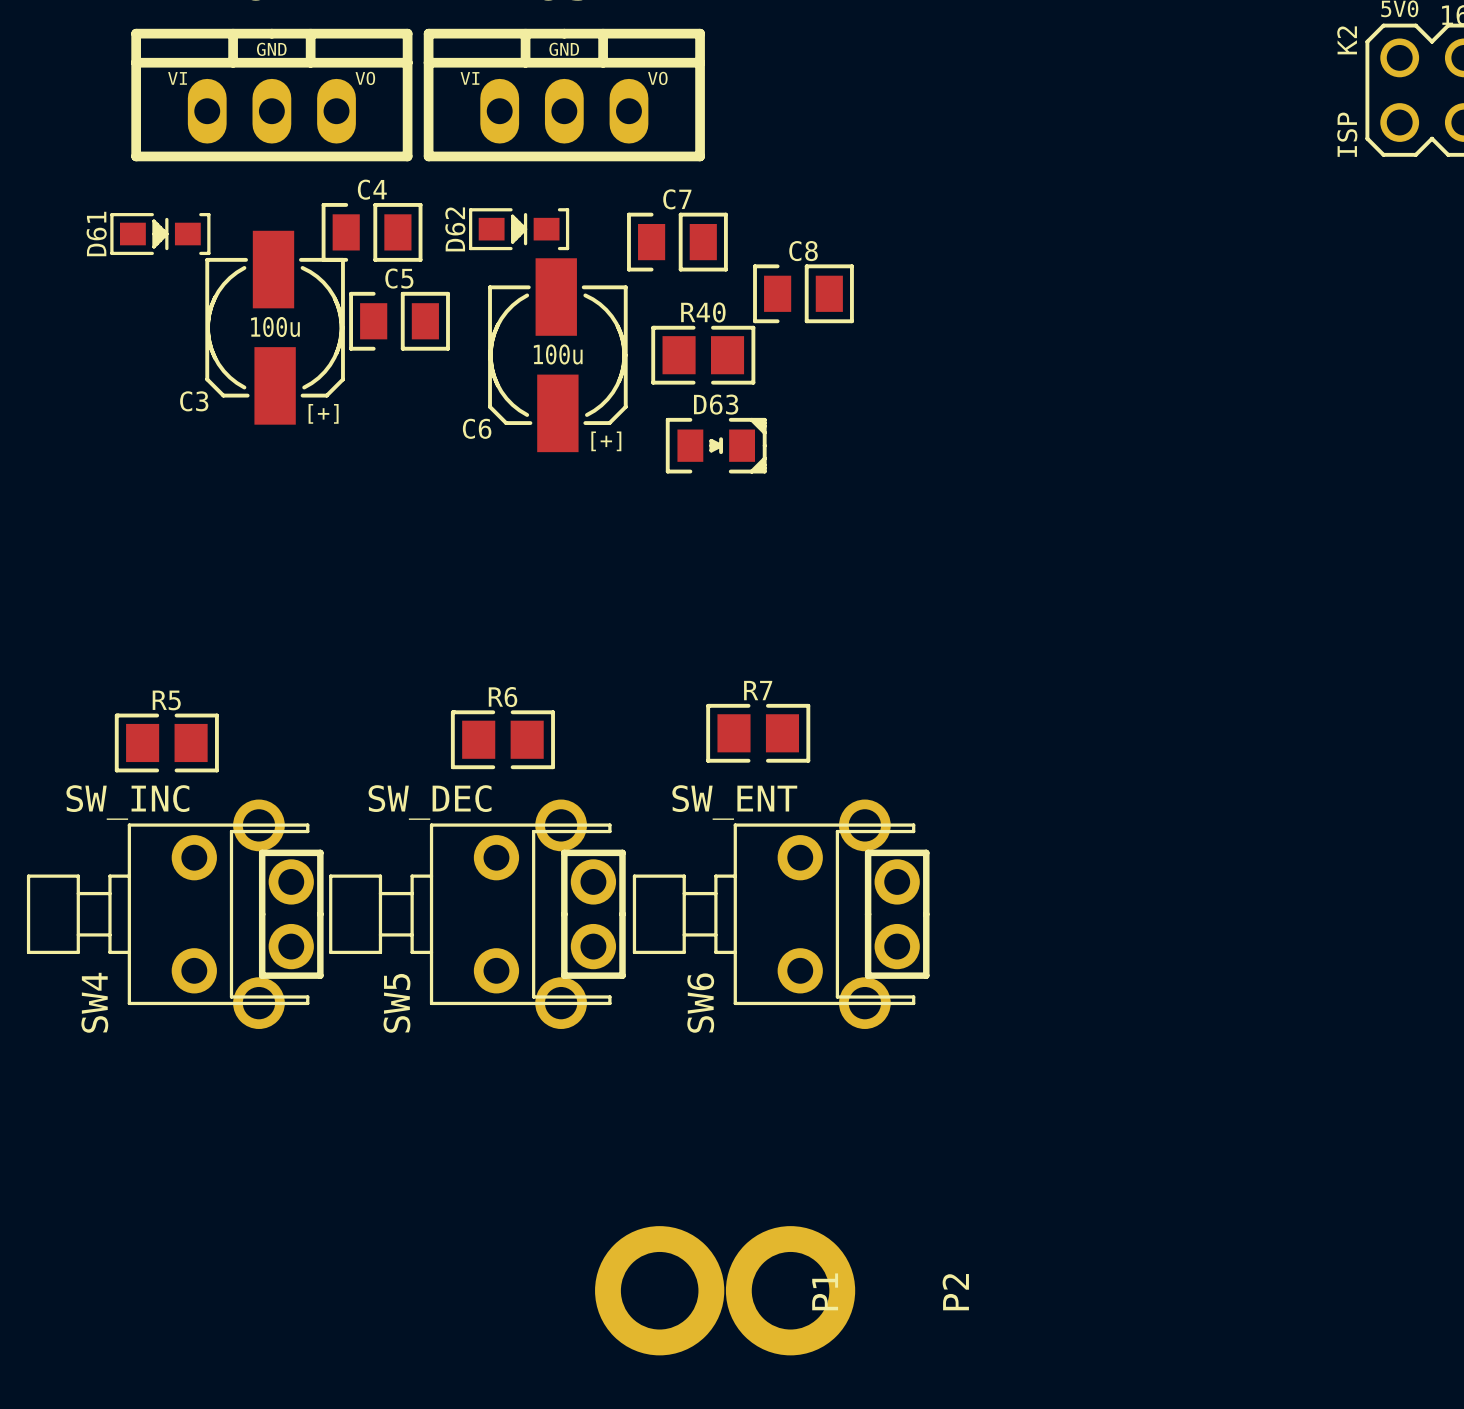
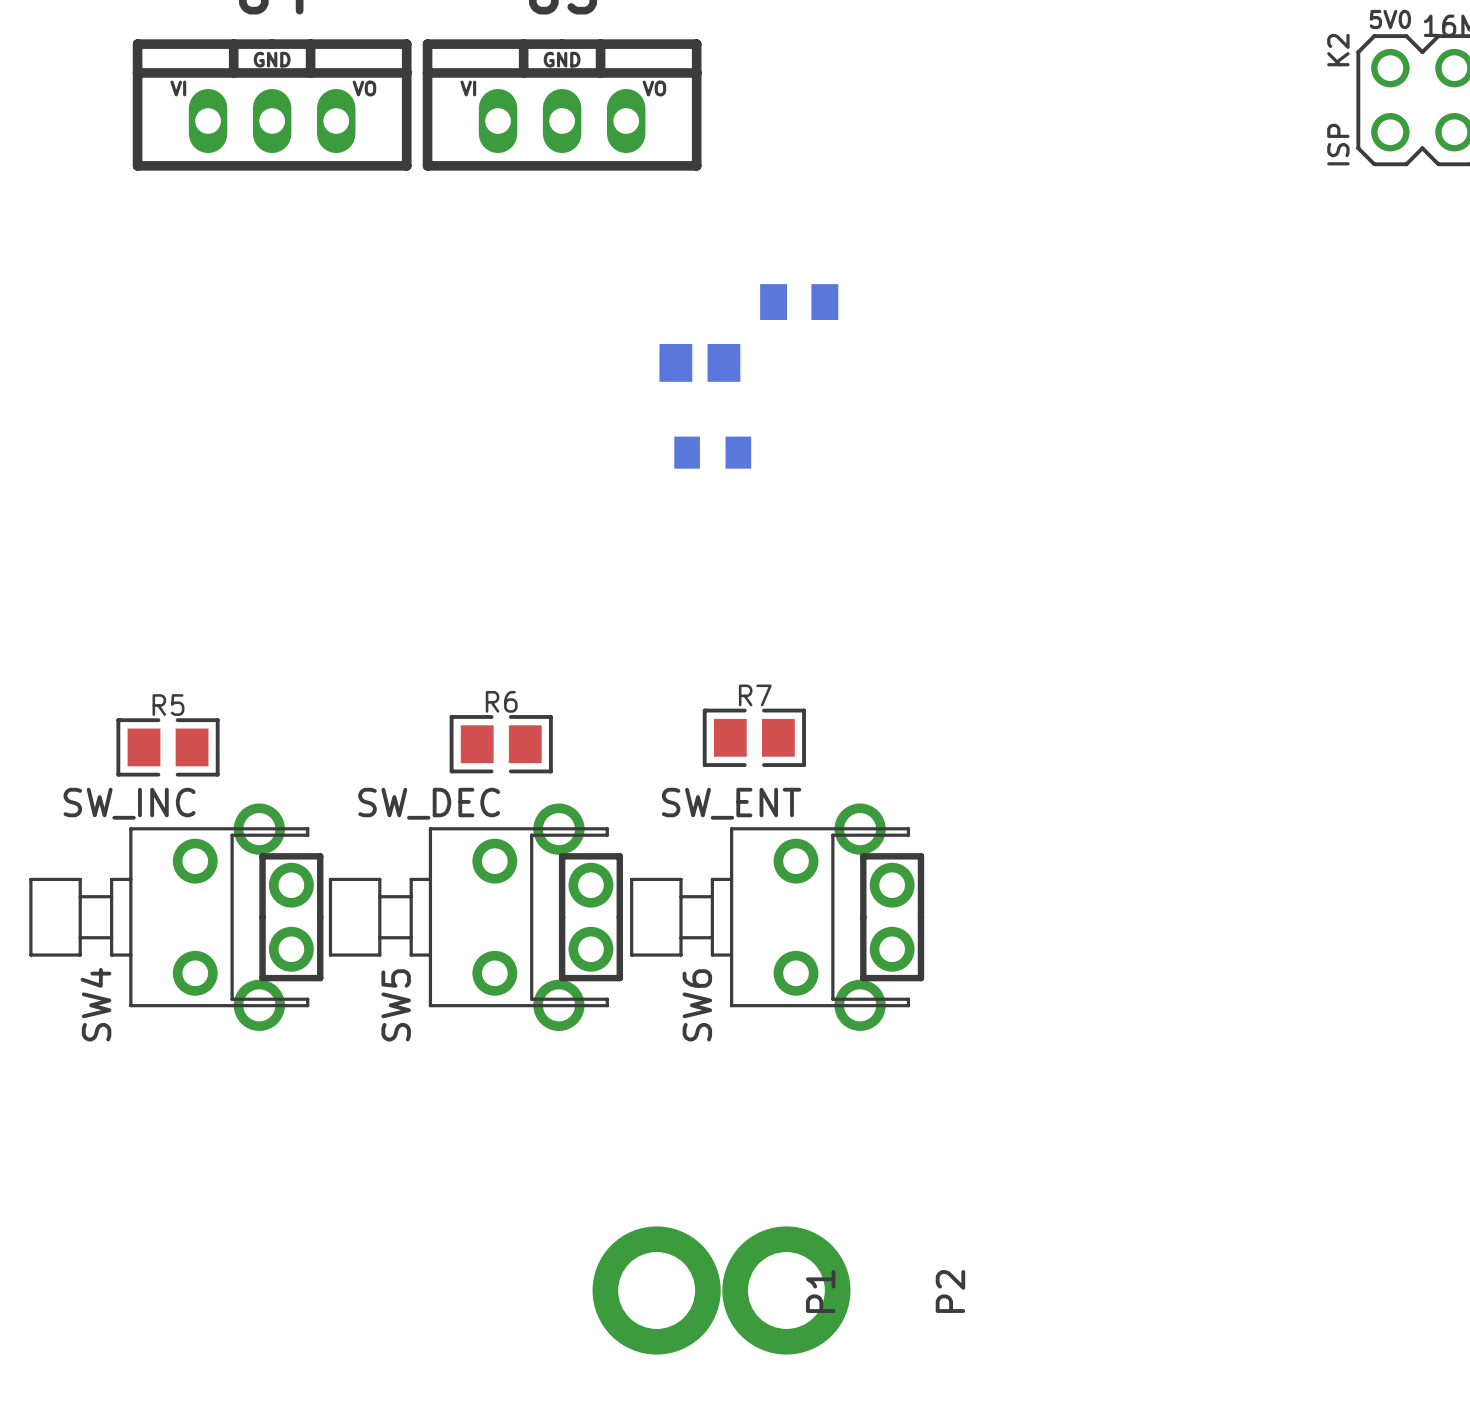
D62: (519, 229) -> none
C4: (372, 232) -> none
D61: (160, 234) -> none
C7: (677, 242) -> none
C8 side: top (803, 293) -> bottom (799, 302)
C5: (399, 321) -> none
C3: 100u (275, 327) -> none
C6: 100u (557, 355) -> none
R40 side: top (703, 355) -> bottom (699, 362)
D63 side: top (716, 445) -> bottom (712, 452)

